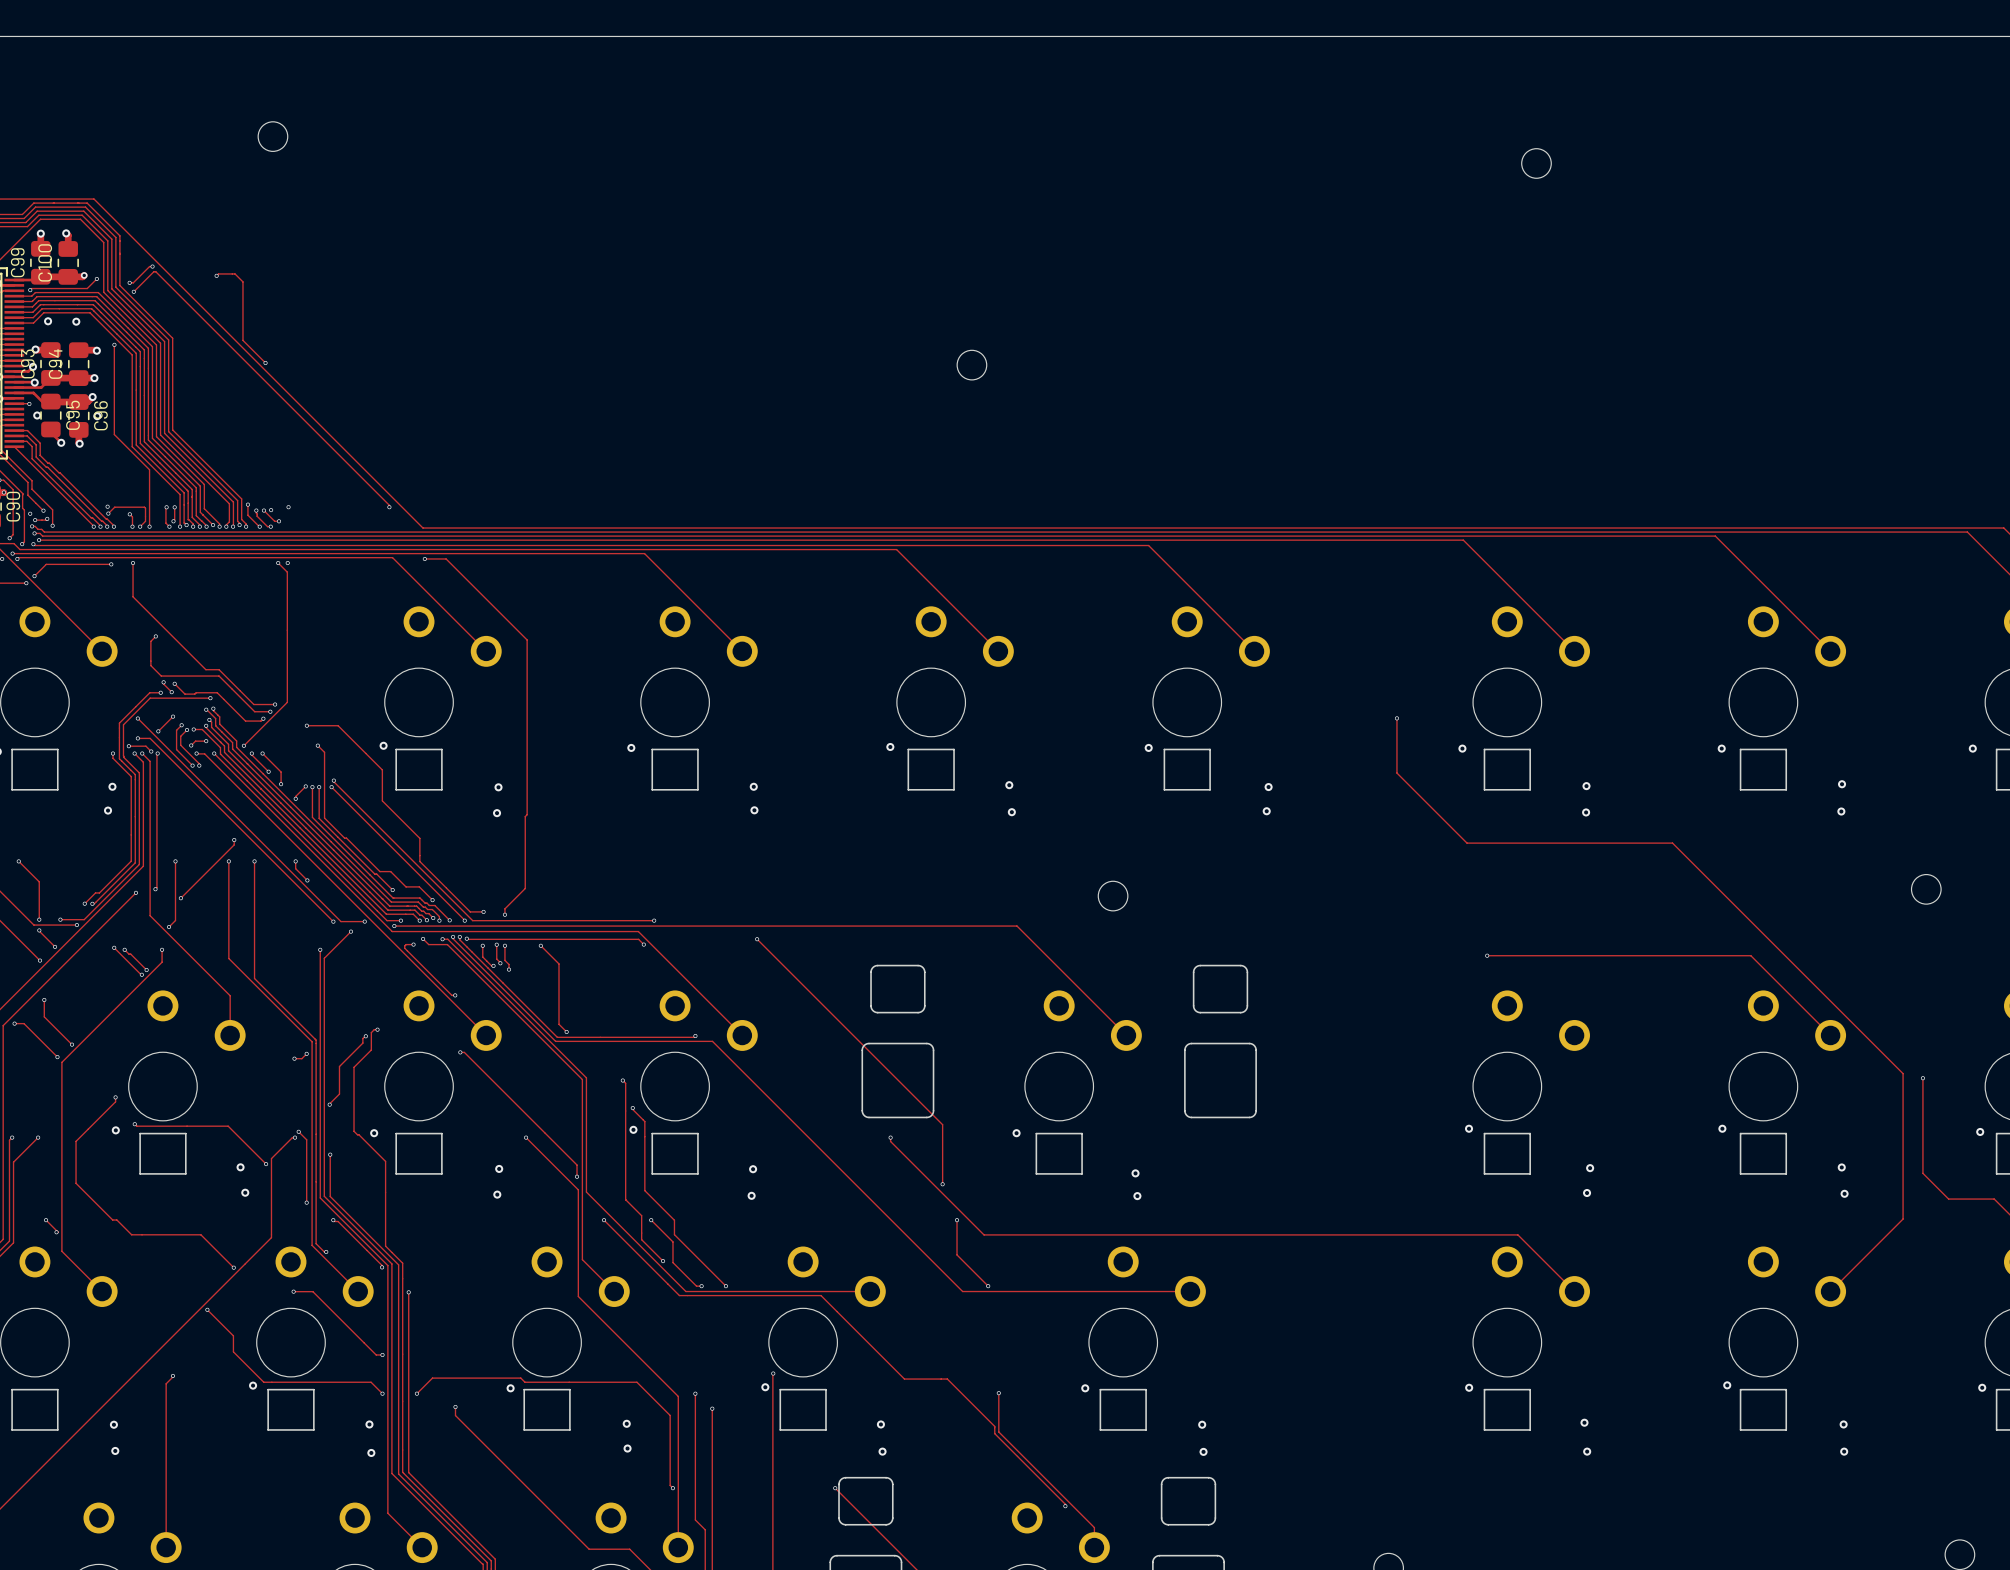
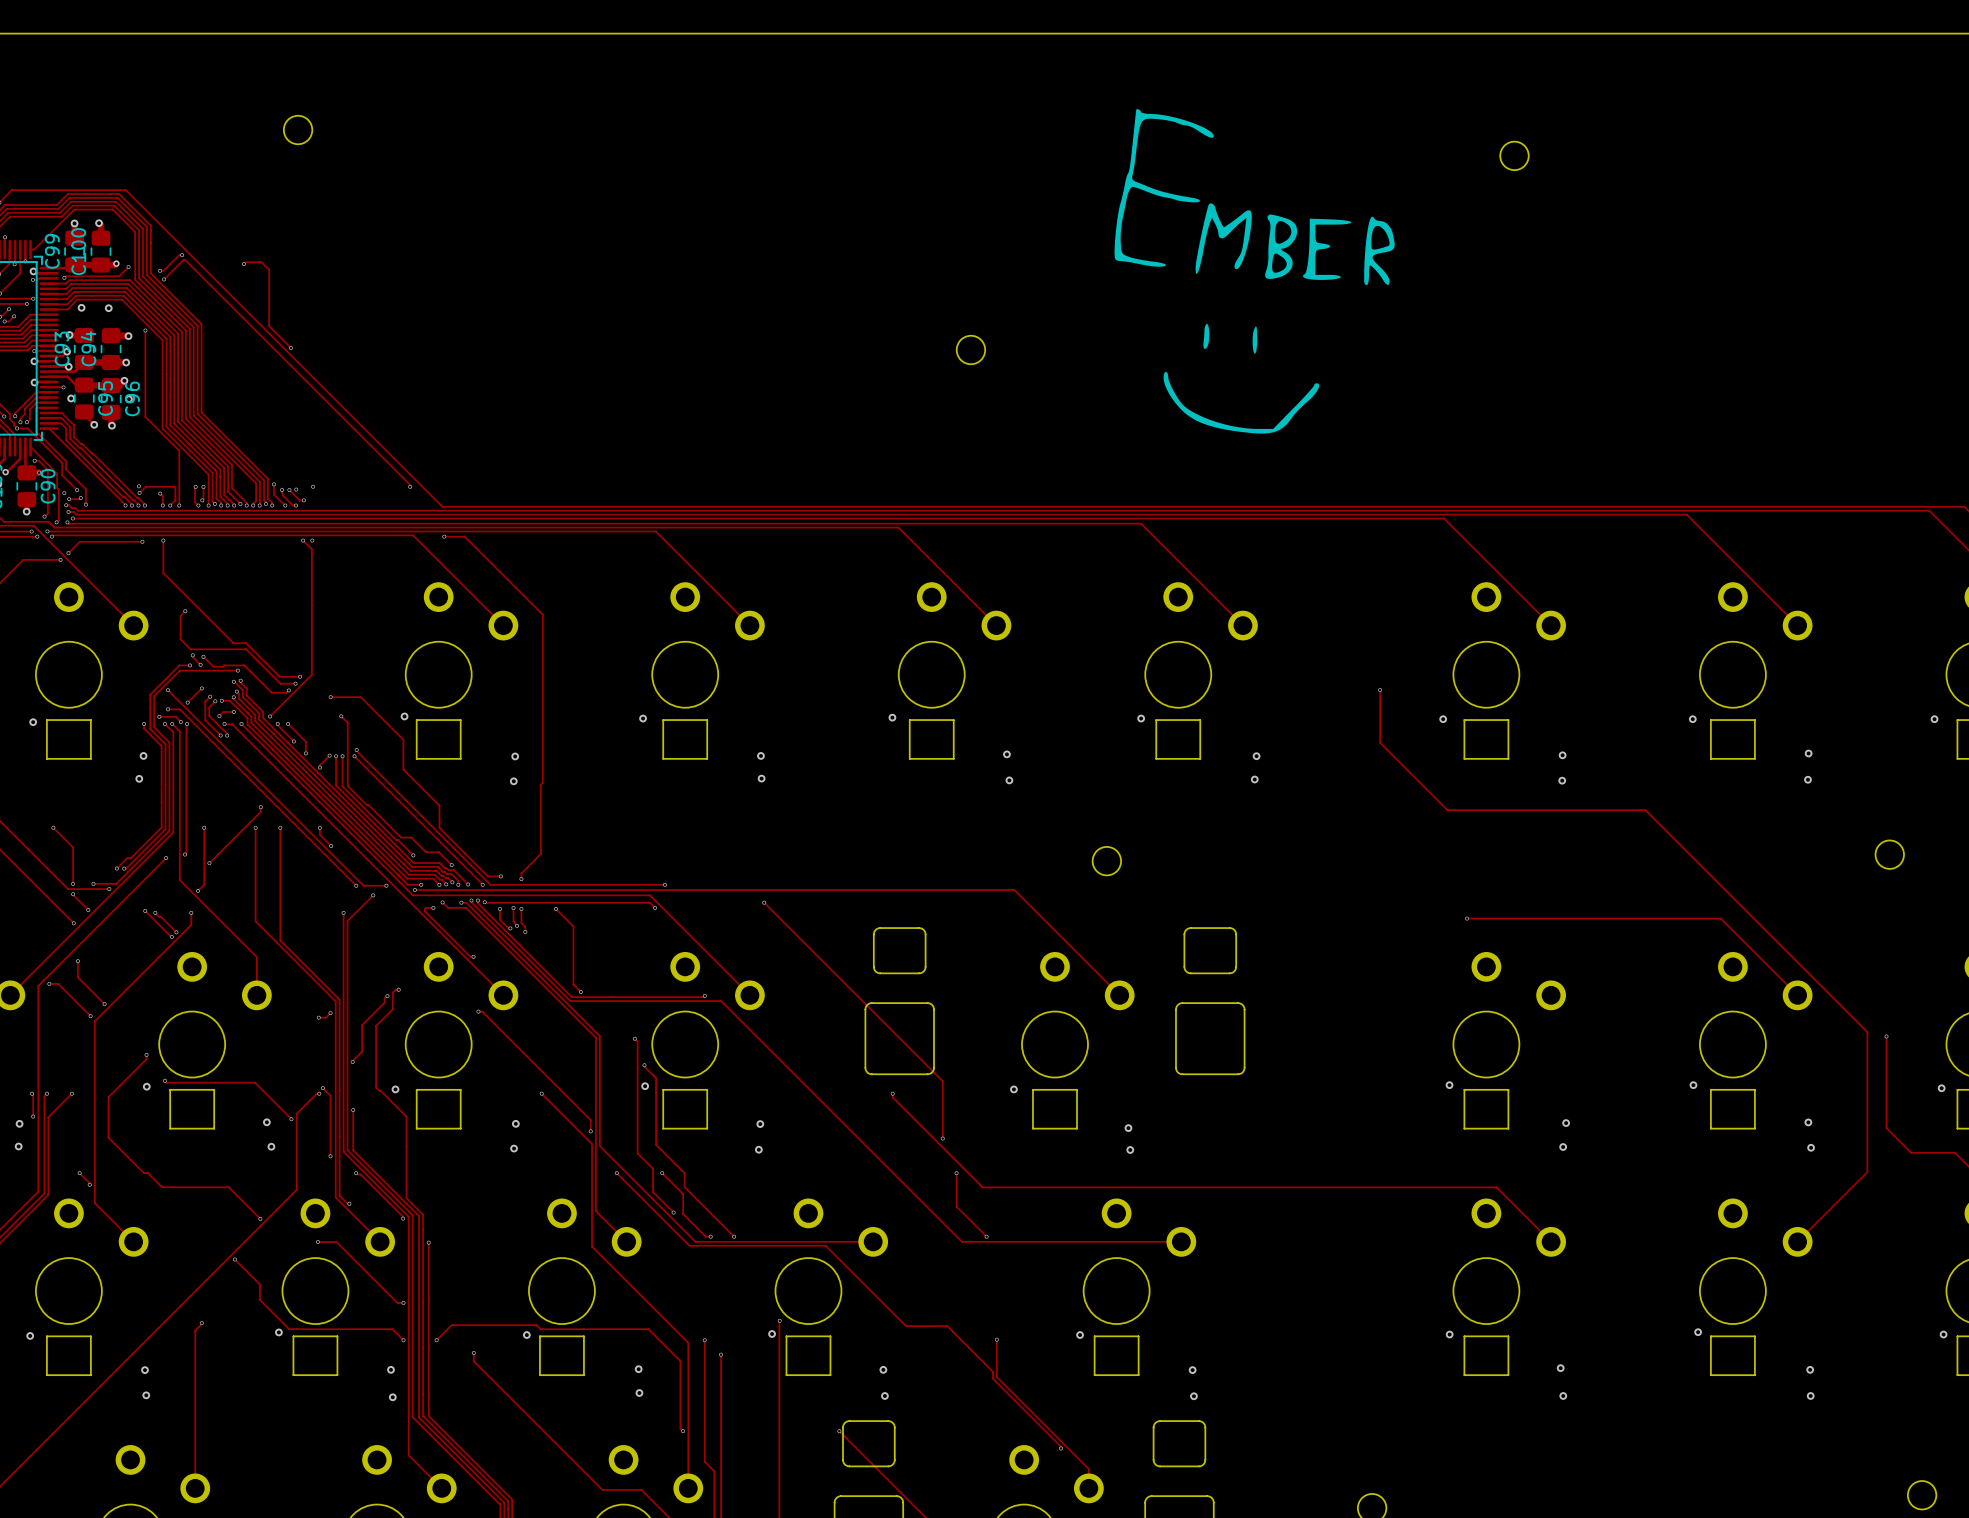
drawing: none -> [1114, 109, 1395, 286]
drawing: none -> [1203, 323, 1210, 349]
drawing: none -> [1252, 326, 1258, 354]
drawing: none -> [1163, 371, 1320, 434]

